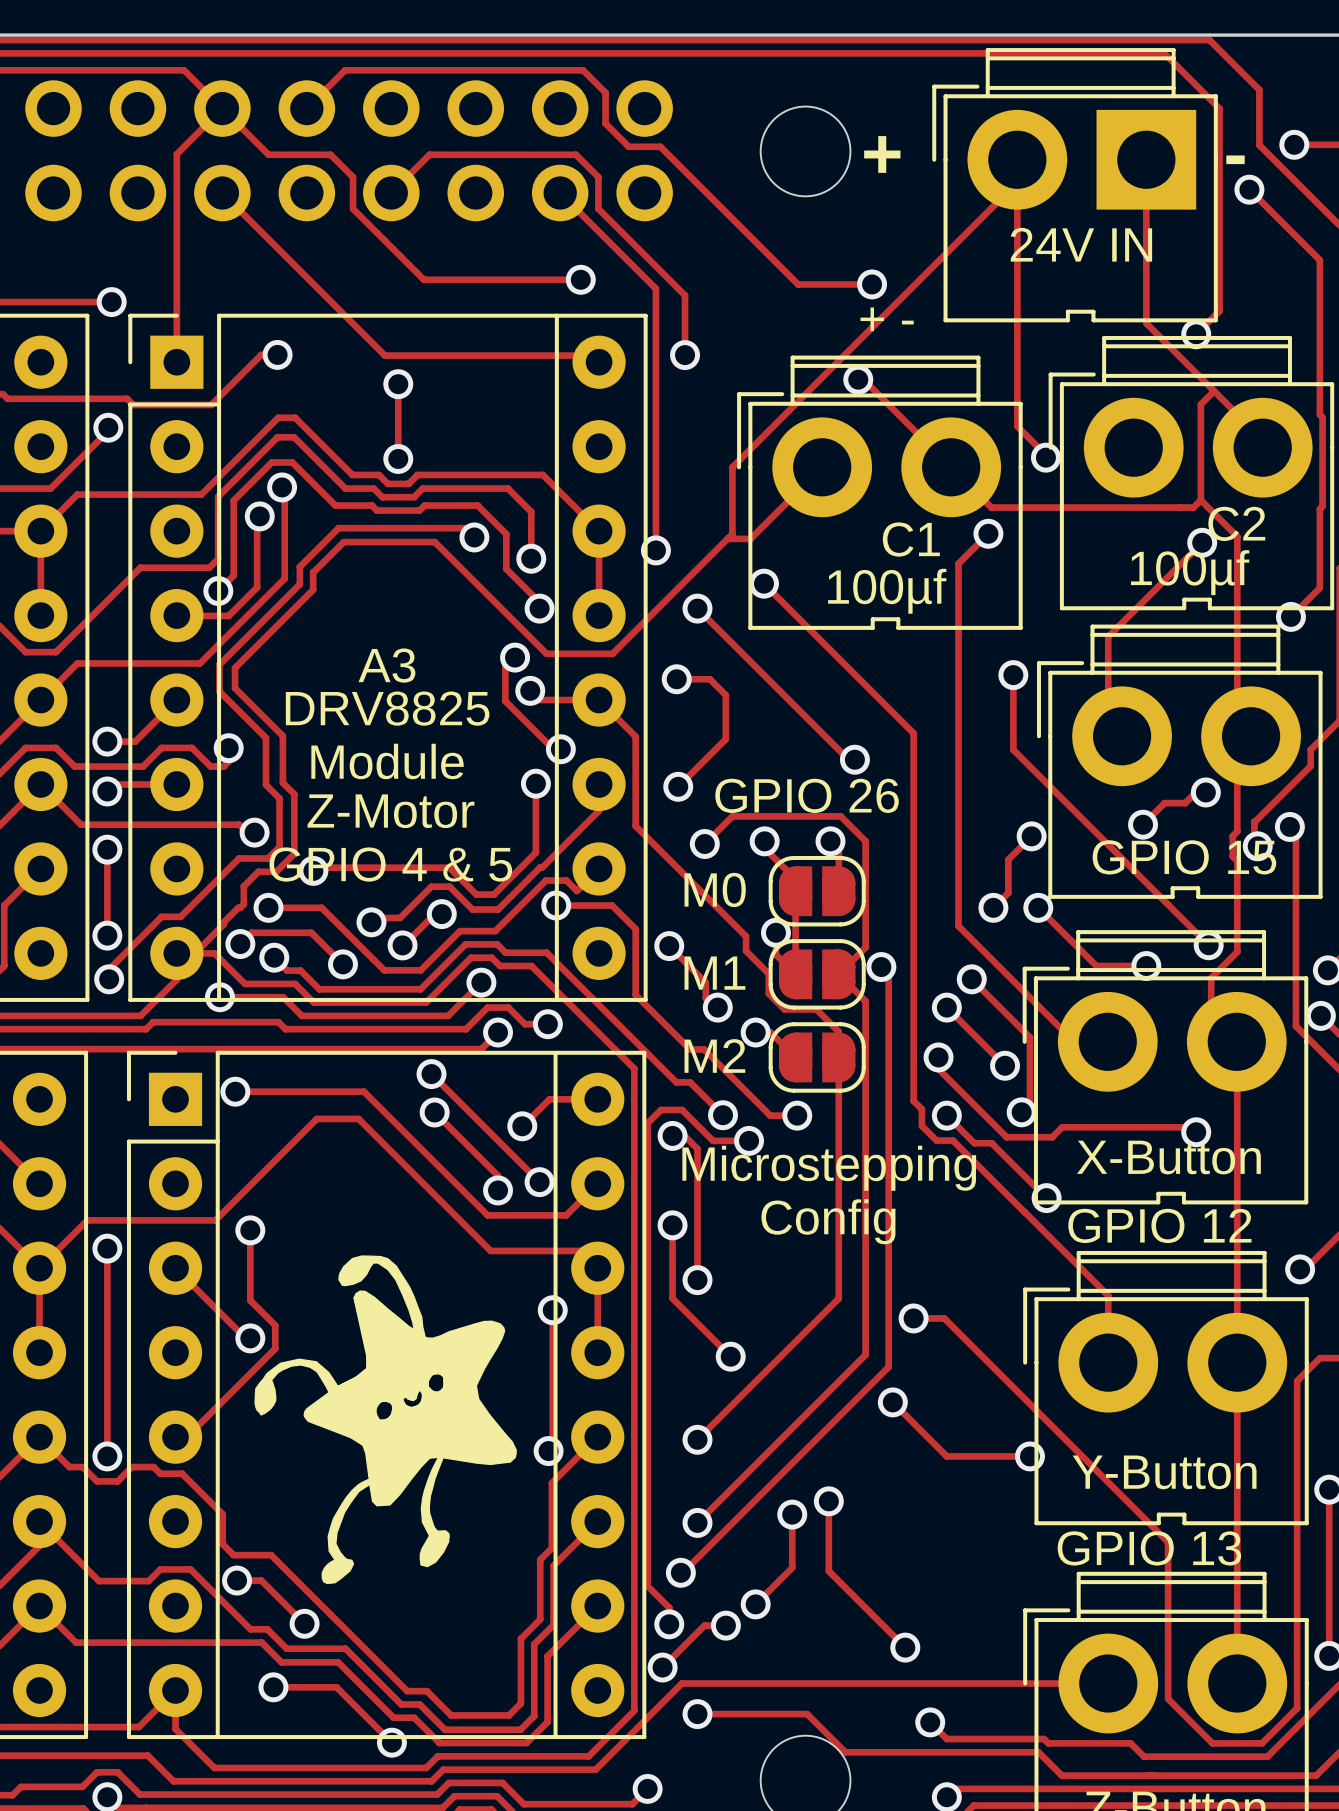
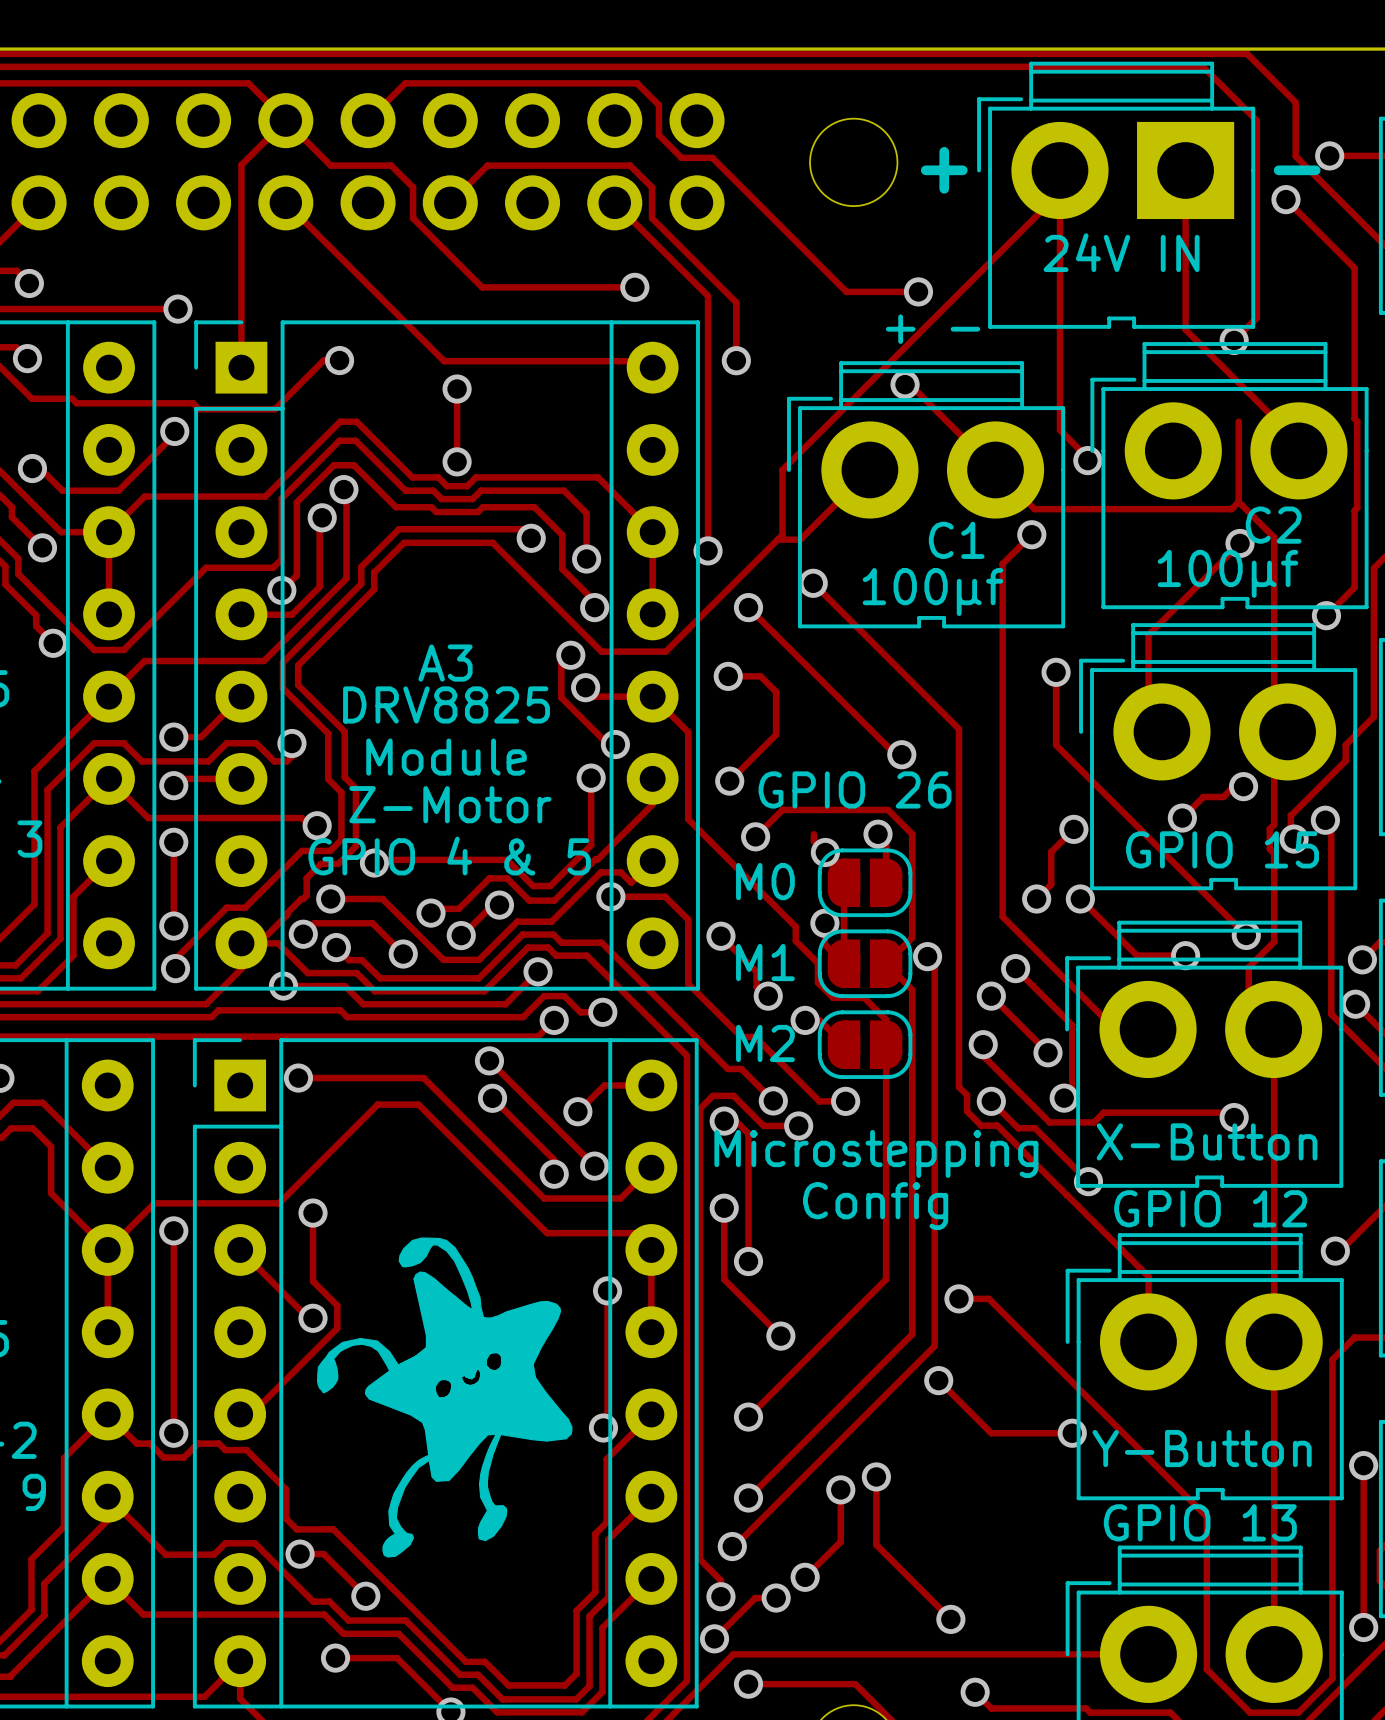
track: (1214, 391) (1200, 404) (1200, 417) -> none
via position: (764, 841) -> (825, 852)

